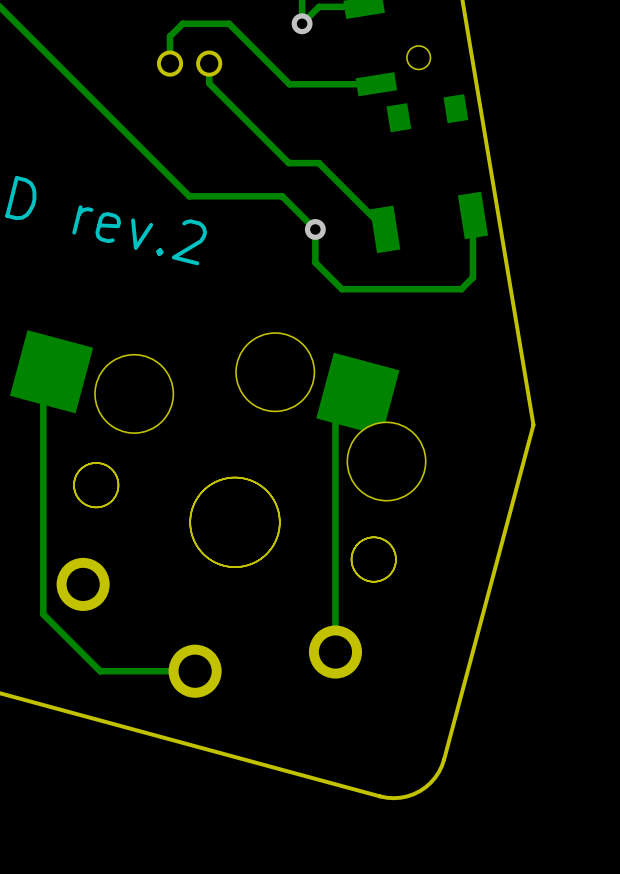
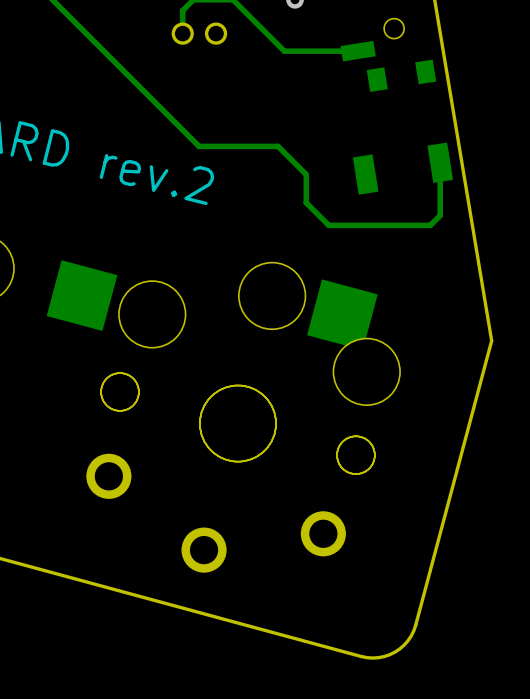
track: (209, 63) (209, 83) (288, 163) (318, 163) (385, 229) -> none
via: (315, 229) -> none
track: (51, 371) (43, 379) (43, 614) (100, 671) (195, 671) -> none
track: (357, 394) (335, 416) (335, 652) -> none

